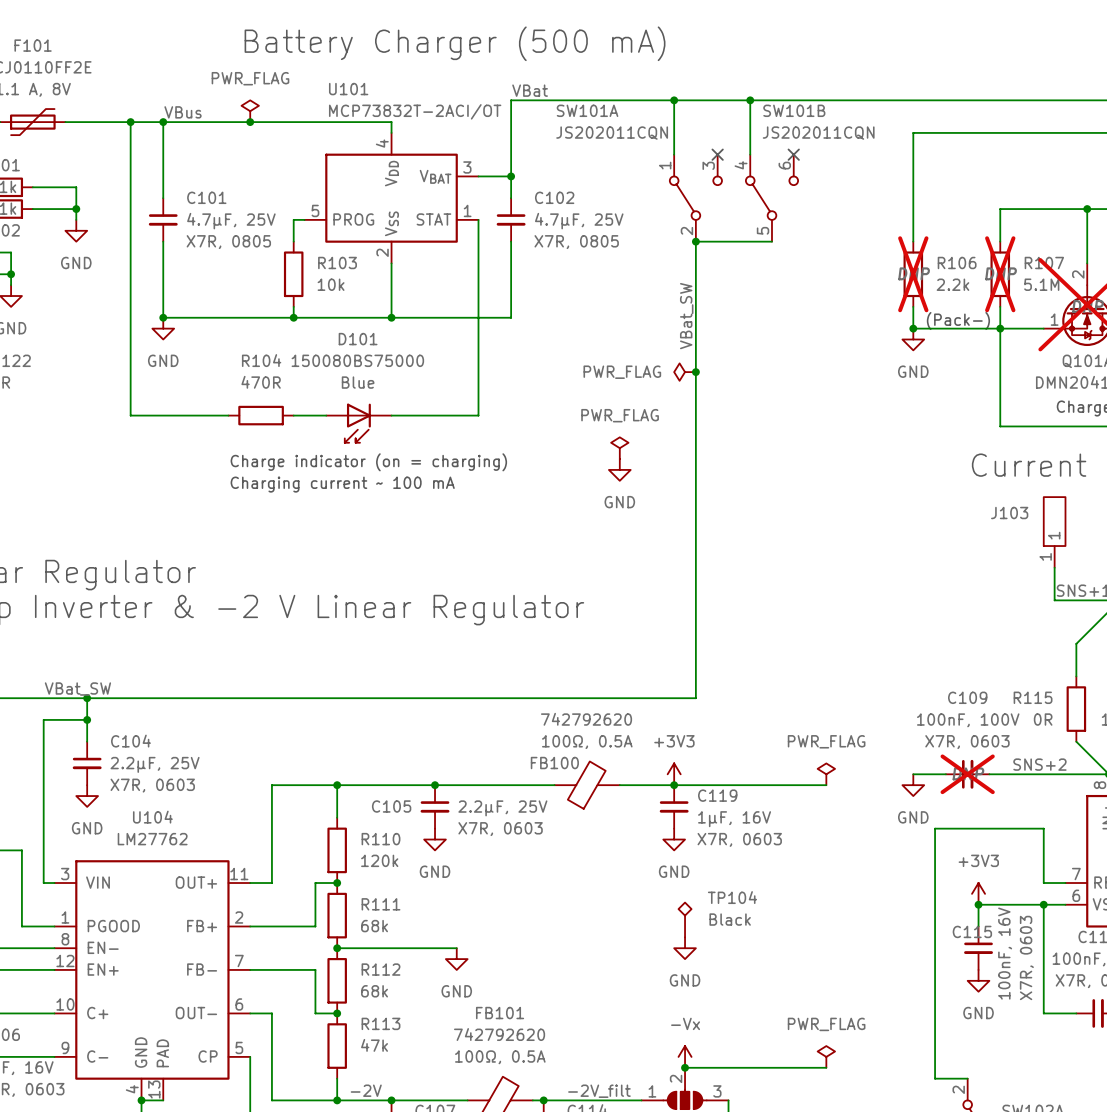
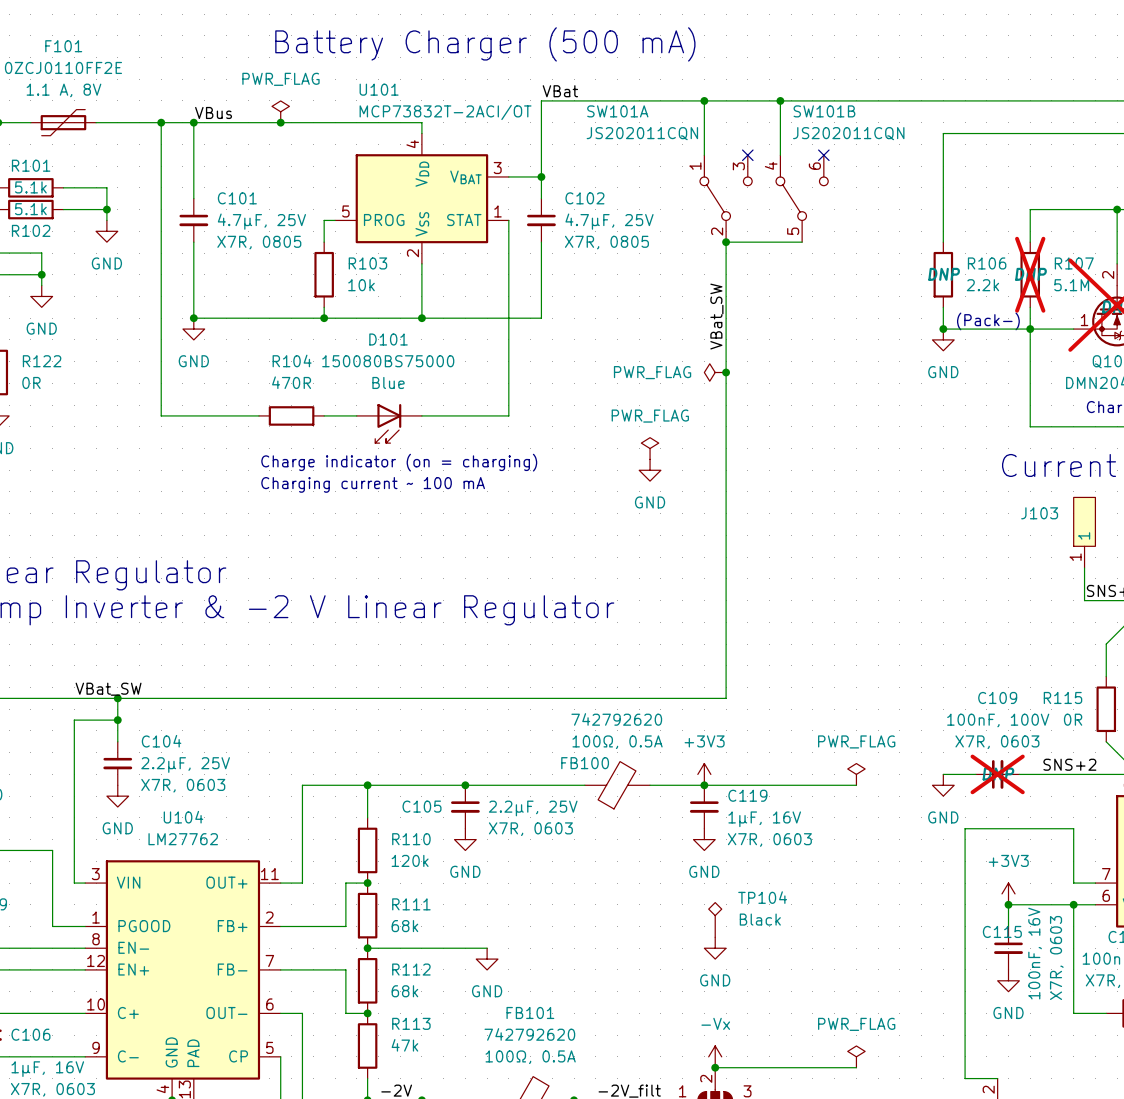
R106 do-not-place cross: (913, 274) -> none

